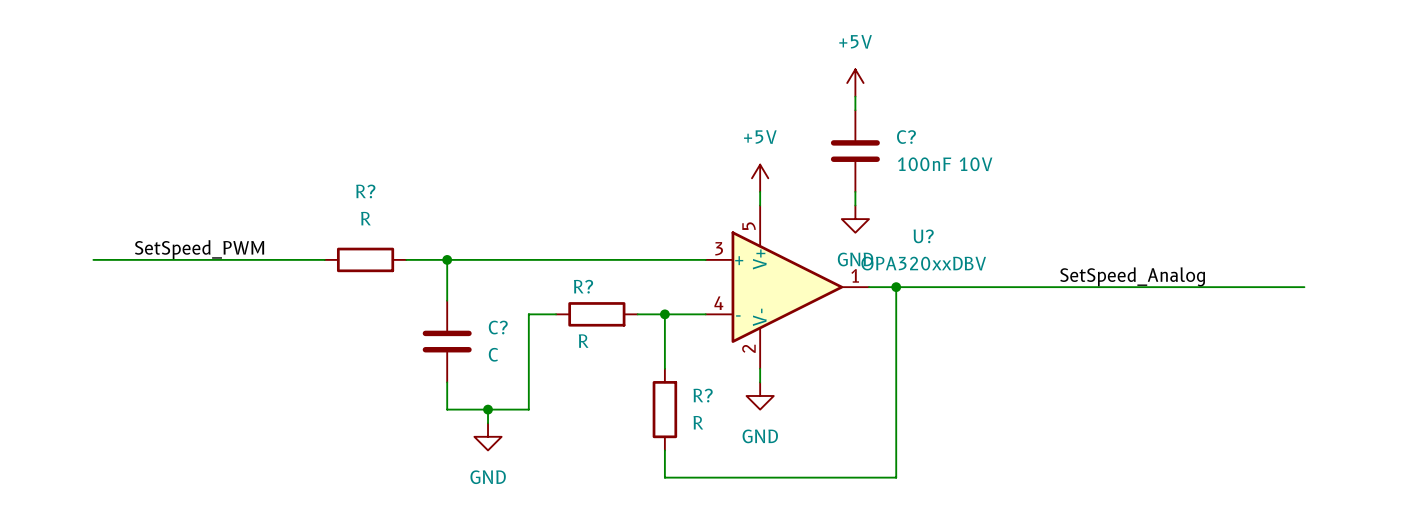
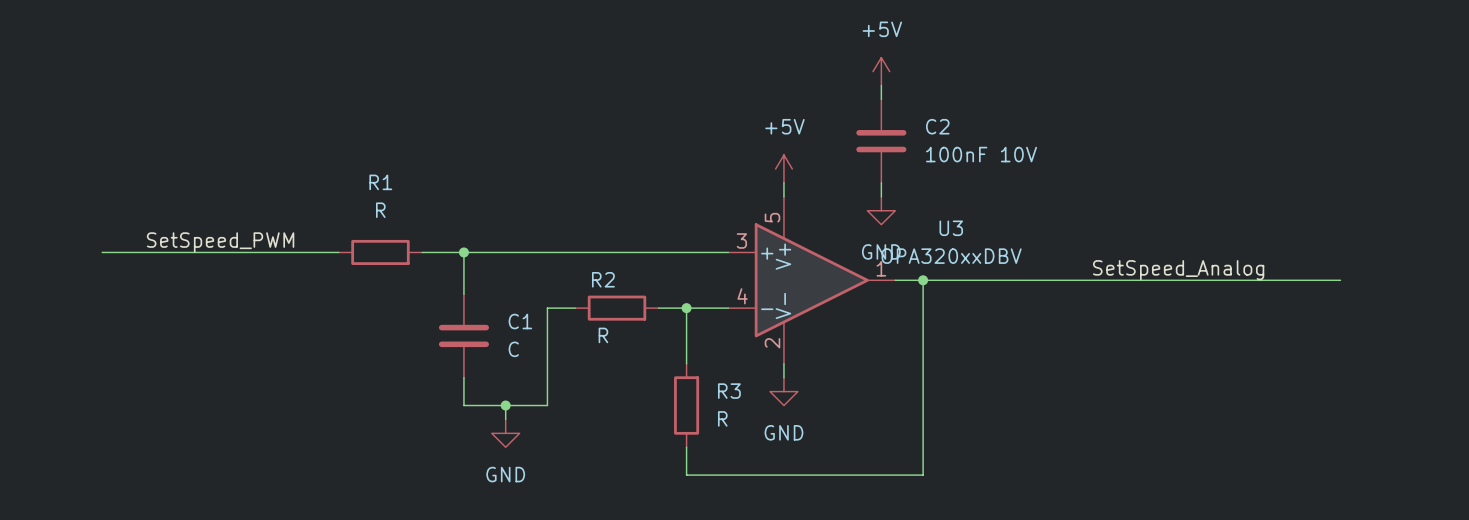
C? name: C? (906, 137) -> C2 (937, 126)
R? name: R? (365, 191) -> R1 (380, 182)
U? name: U? (923, 236) -> U3 (951, 228)
R? name: R? (583, 286) -> R2 (603, 279)
C? name: C? (498, 327) -> C1 (520, 321)
R? name: R? (703, 395) -> R3 (729, 391)

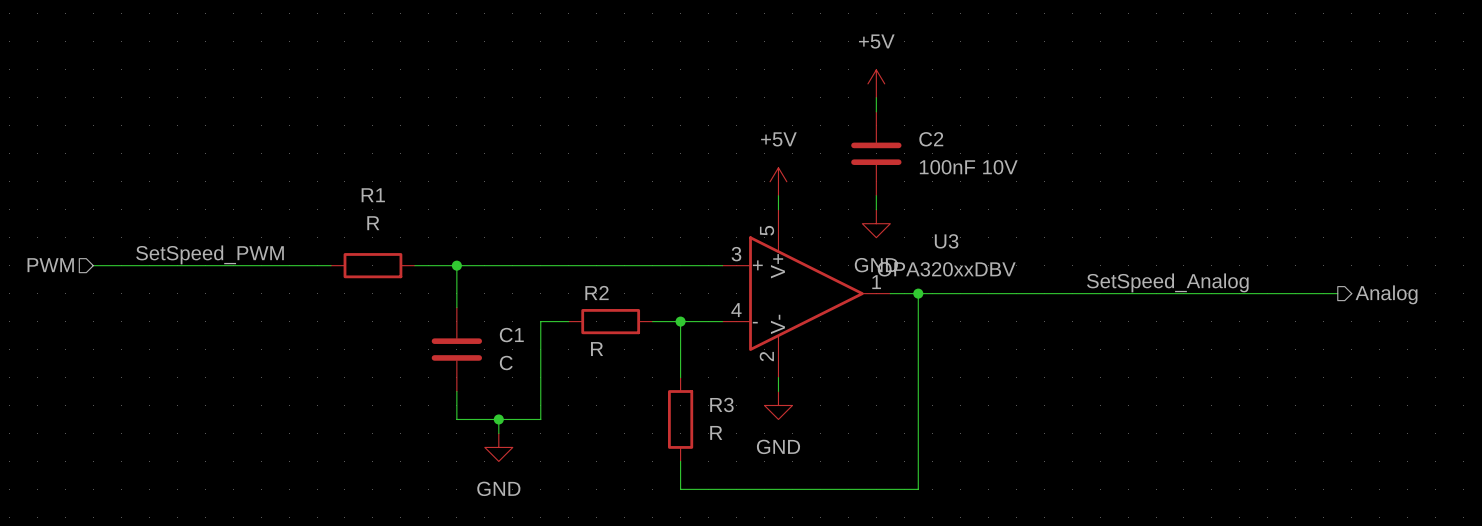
hierarchical label: none -> PWM (50, 265)
hierarchical label: none -> Analog (1386, 294)

